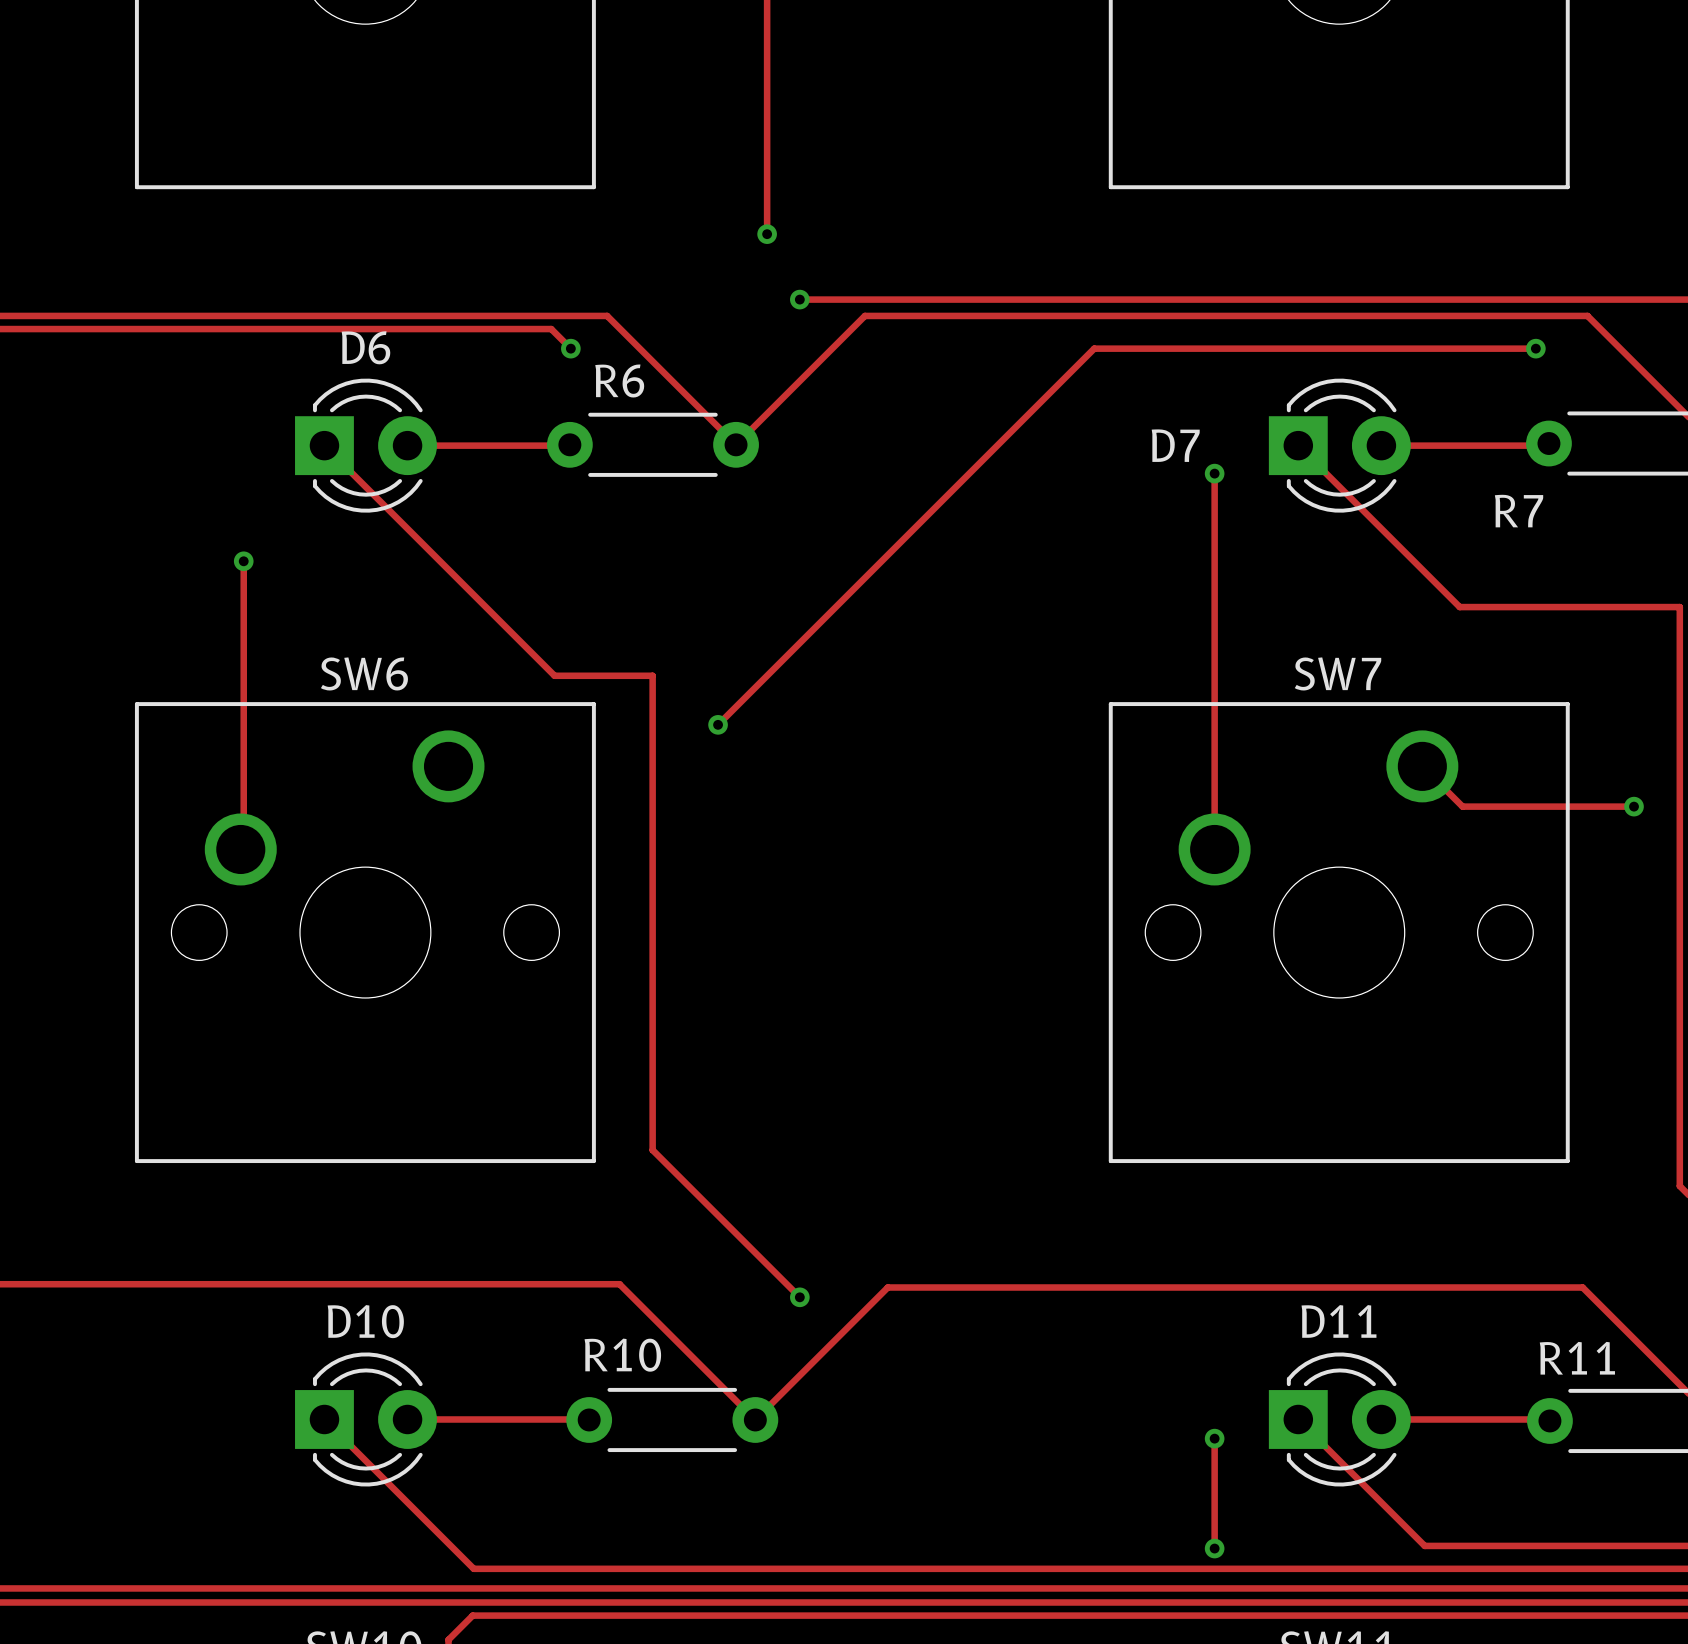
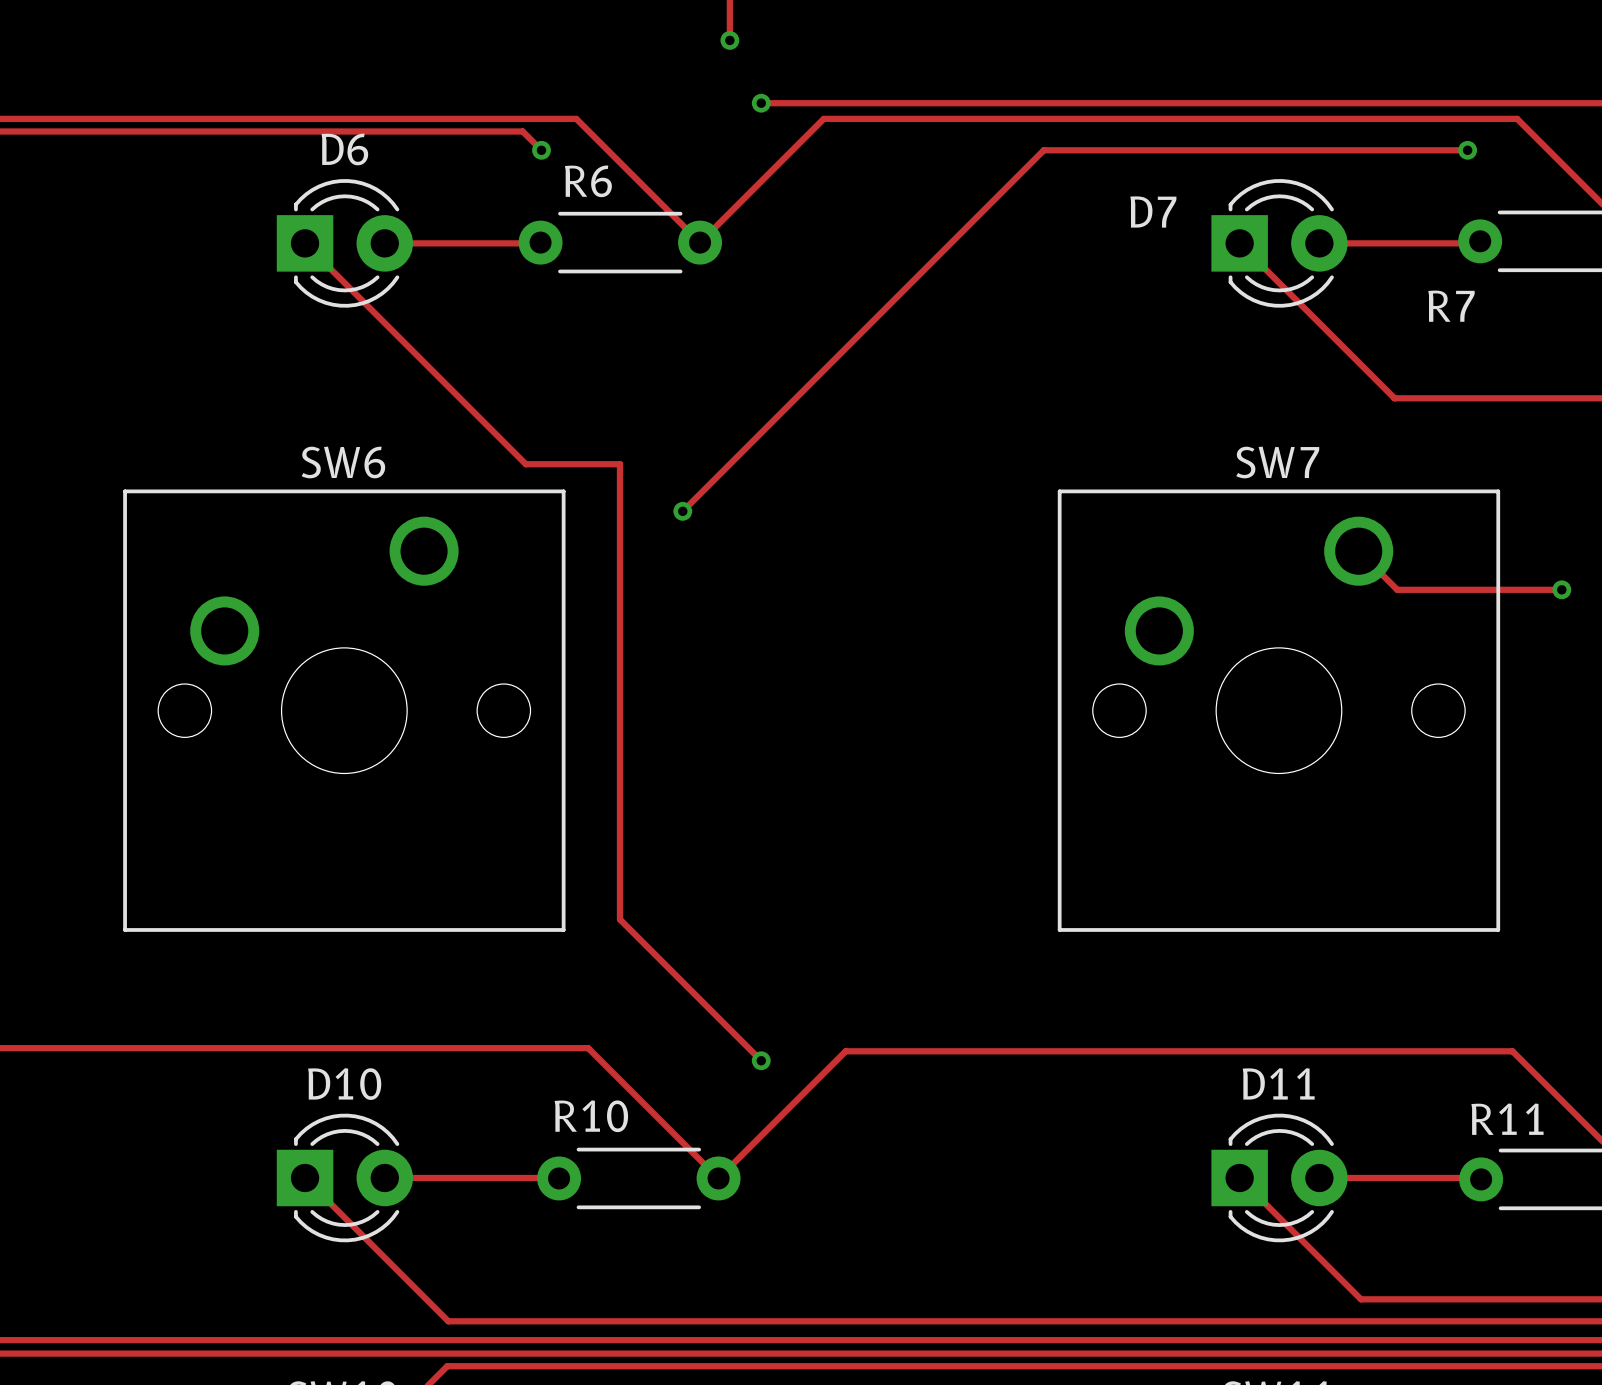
D7 name position: D7 (1175, 445) -> D7 (1153, 212)
track: (1214, 473) (1214, 849) -> none
via: (1214, 473) -> none
track: (243, 561) (243, 846) (240, 849) -> none
via: (243, 561) -> none
track: (1214, 1438) (1214, 1548) -> none
via: (1214, 1438) -> none
via: (1214, 1548) -> none

